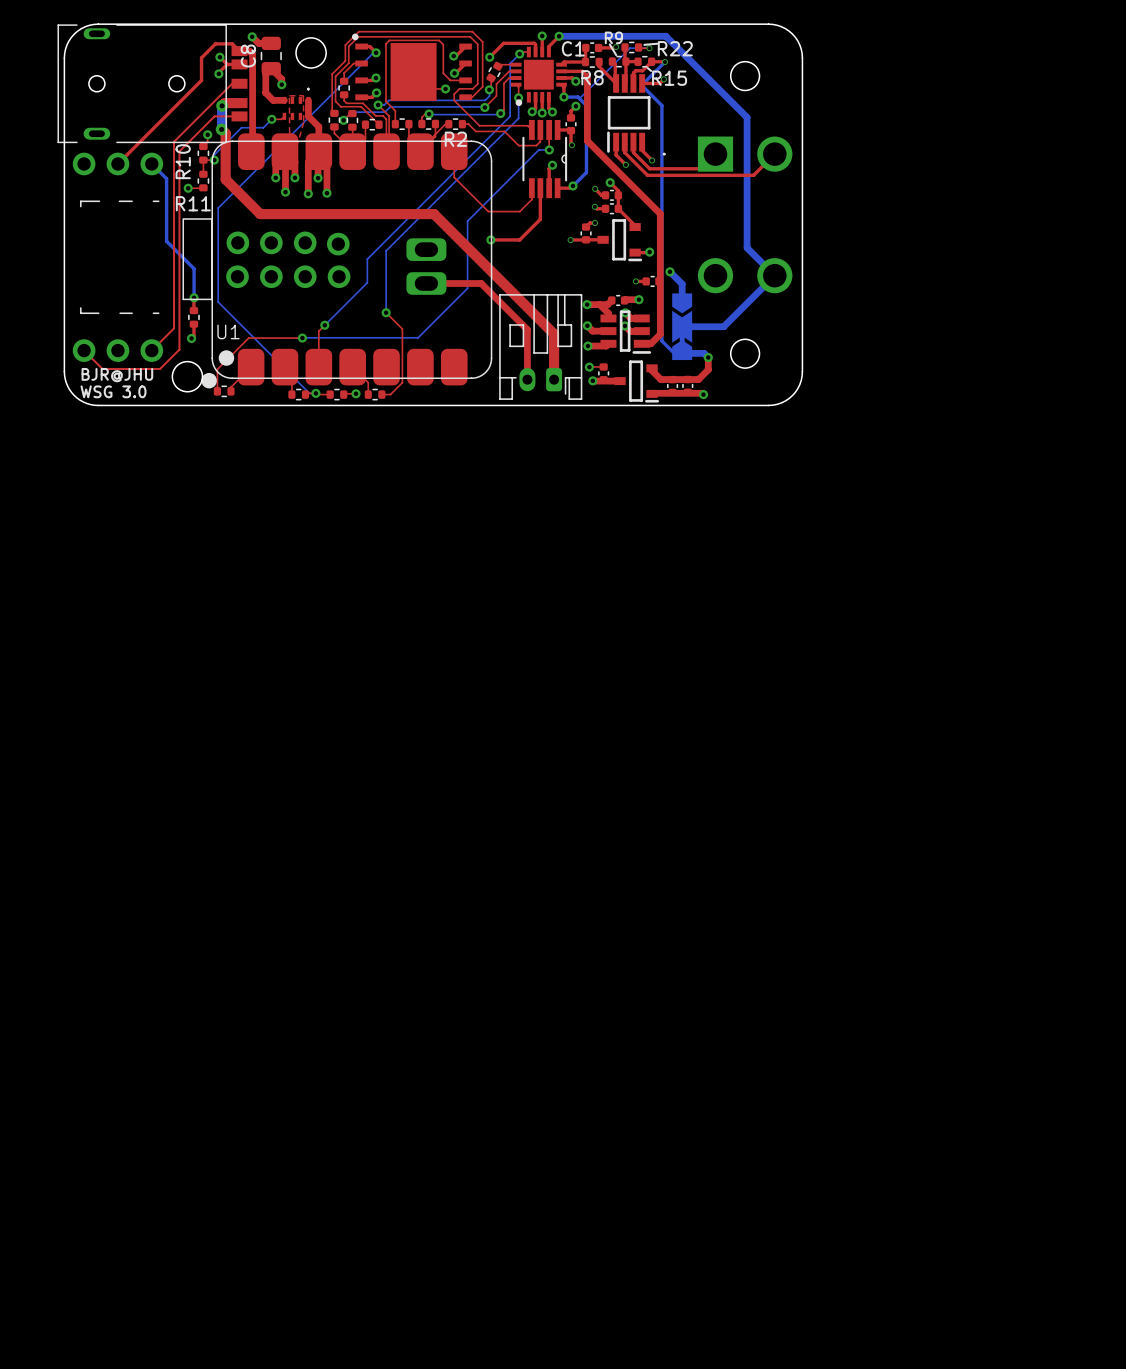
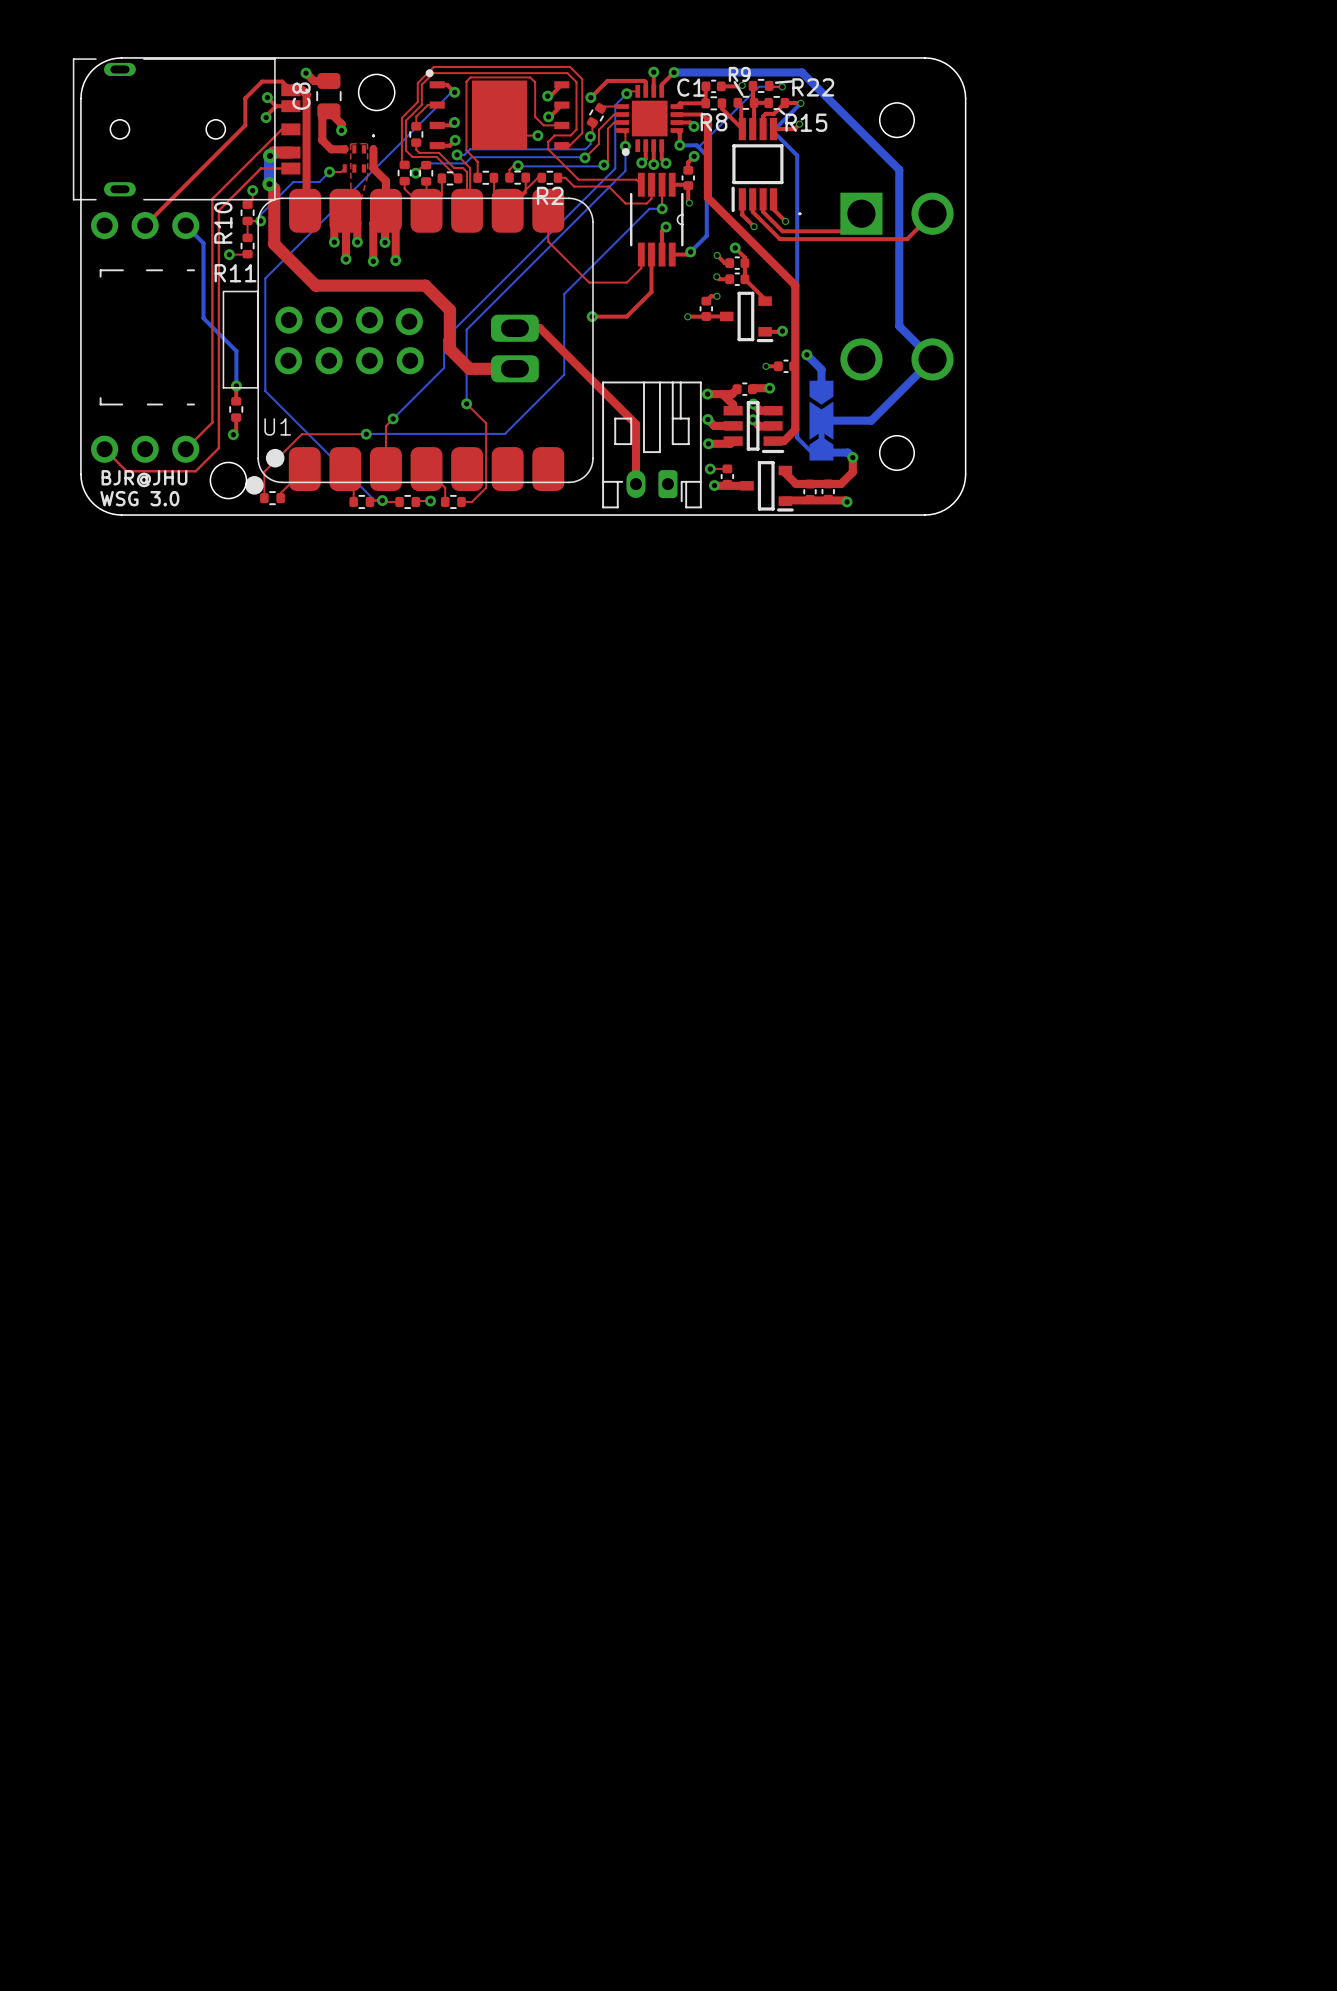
top track: (351, 214) (434, 214) (554, 334) (554, 379) -> (425, 285) (449, 310) (449, 349) (469, 368) (514, 368)
top track: (426, 283) (481, 283) -> (514, 328) (540, 328) (580, 368)

